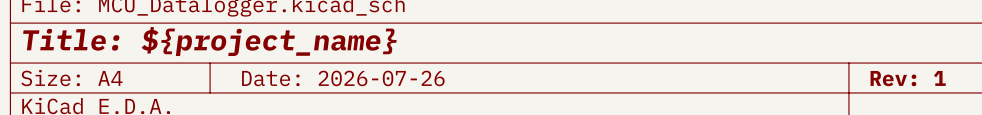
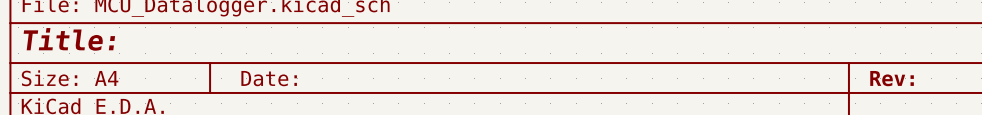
title block: Title: ${project_name} (209, 41) -> Title: (69, 39)
title block: Date: 2026-07-26 (343, 78) -> Date: (269, 78)
title block: Rev: 1 (908, 78) -> Rev: (892, 78)

